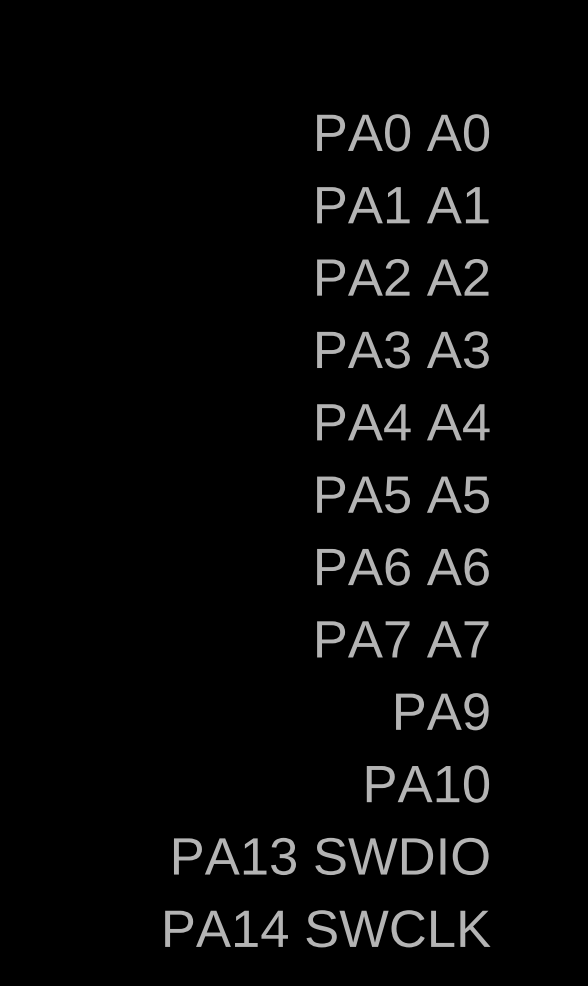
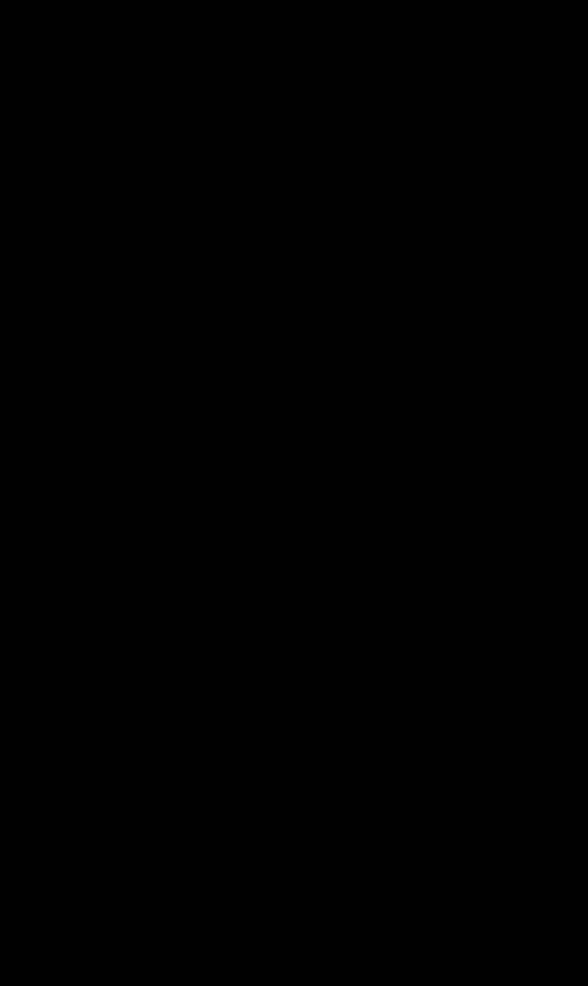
label: PA0 A0 (403, 132) -> none
label: PA1 A1 (402, 205) -> none
label: PA2 A2 (402, 277) -> none
label: PA3 A3 (402, 349) -> none
label: PA4 A4 (403, 422) -> none
label: PA5 A5 (403, 494) -> none
label: PA6 A6 (402, 567) -> none
label: PA7 A7 (402, 639) -> none
label: PA9 (442, 711) -> none
label: PA10 (427, 784) -> none
label: PA13 SWDIO (331, 856) -> none
label: PA14 SWCLK (327, 928) -> none

